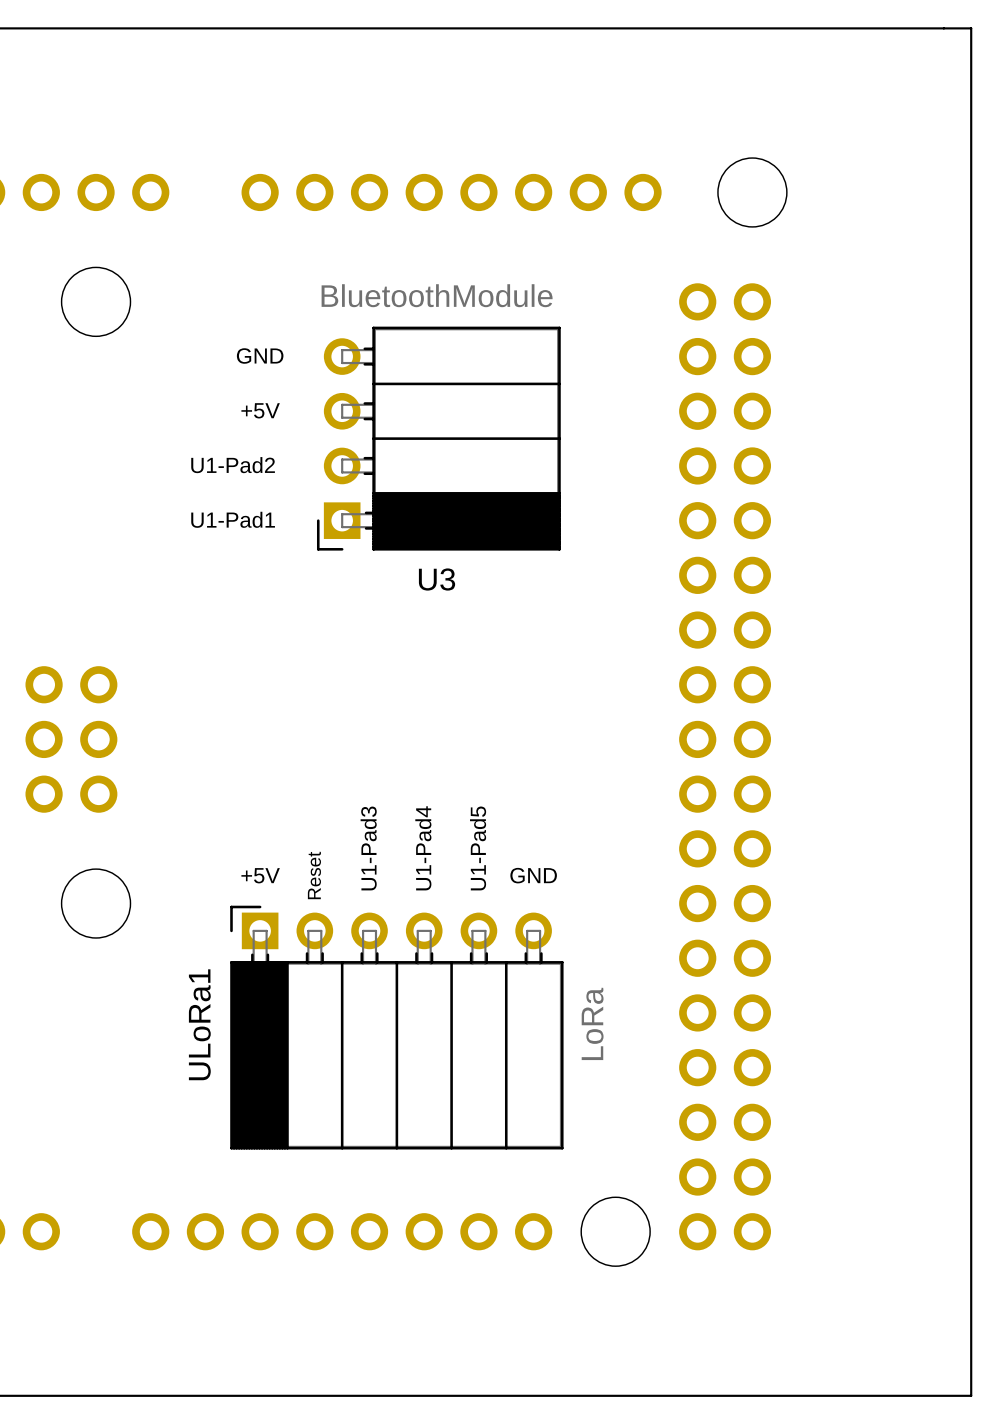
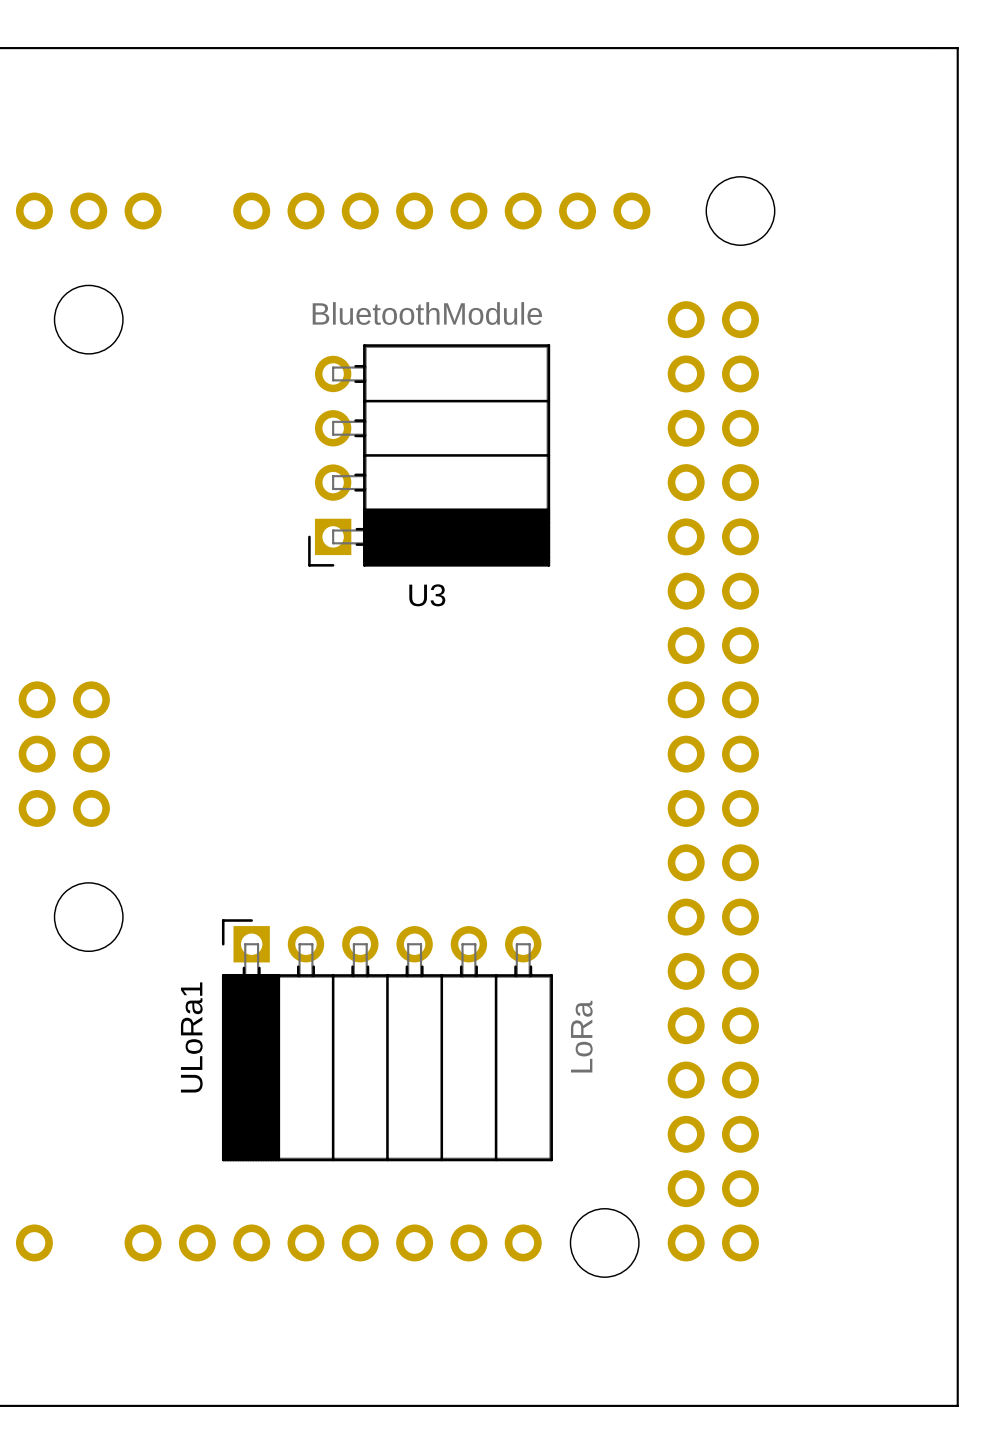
text: GND (260, 356) -> none
text: +5V (260, 410) -> none
text: U1-Pad2 (233, 465) -> none
text: U1-Pad1 (233, 519) -> none
text: U1-Pad3 (368, 848) -> none
text: U1-Pad4 (423, 848) -> none
text: U1-Pad5 (478, 848) -> none
text: +5V (260, 875) -> none
text: Reset (314, 875) -> none
text: GND (533, 875) -> none

